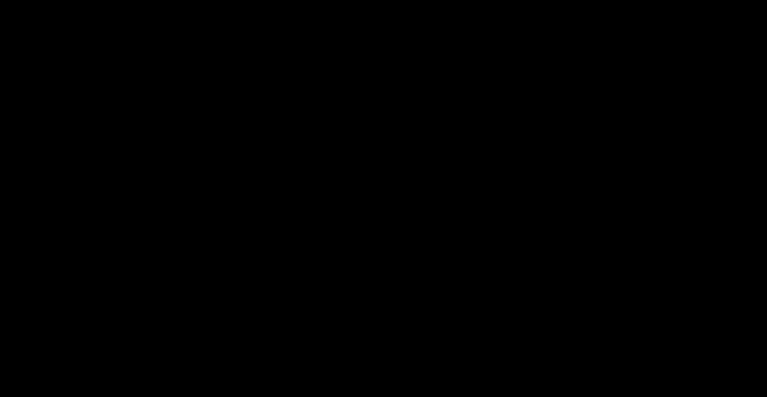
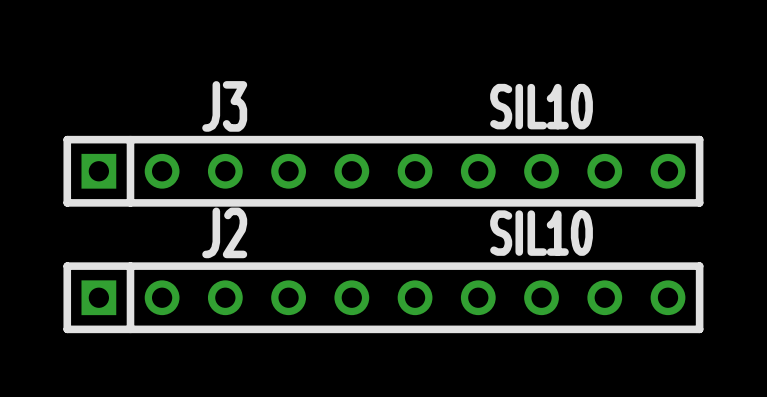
J3: none -> SIL10 (383, 171)
J2: none -> SIL10 (383, 297)

